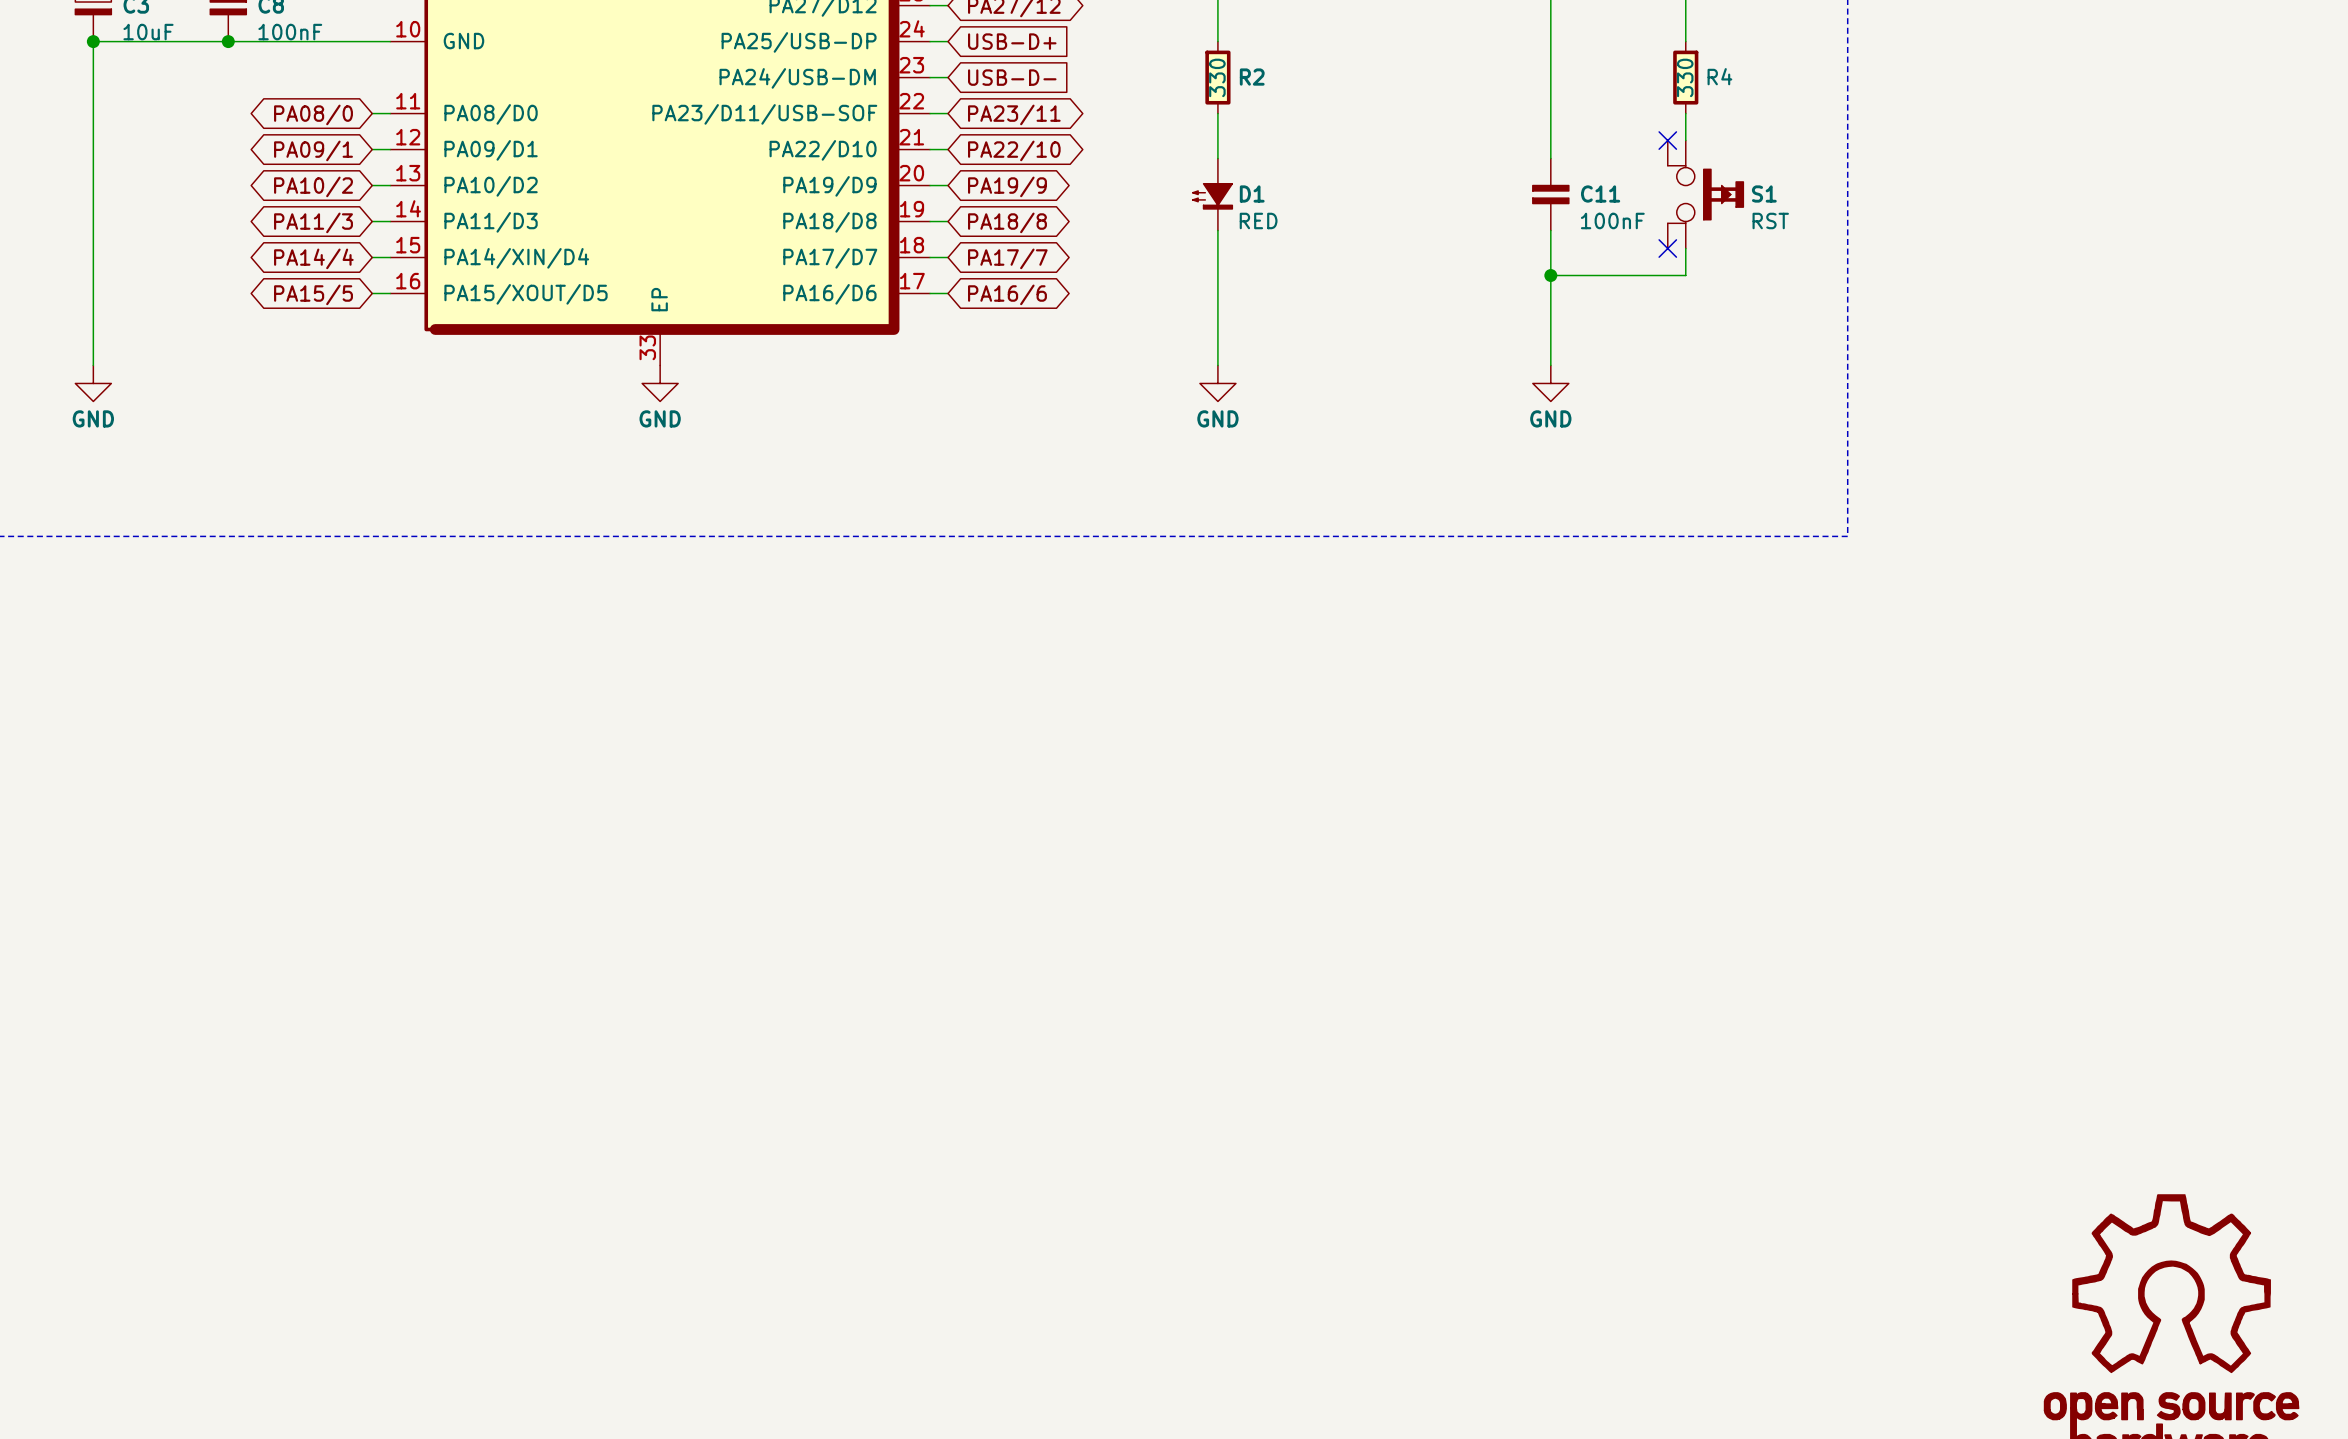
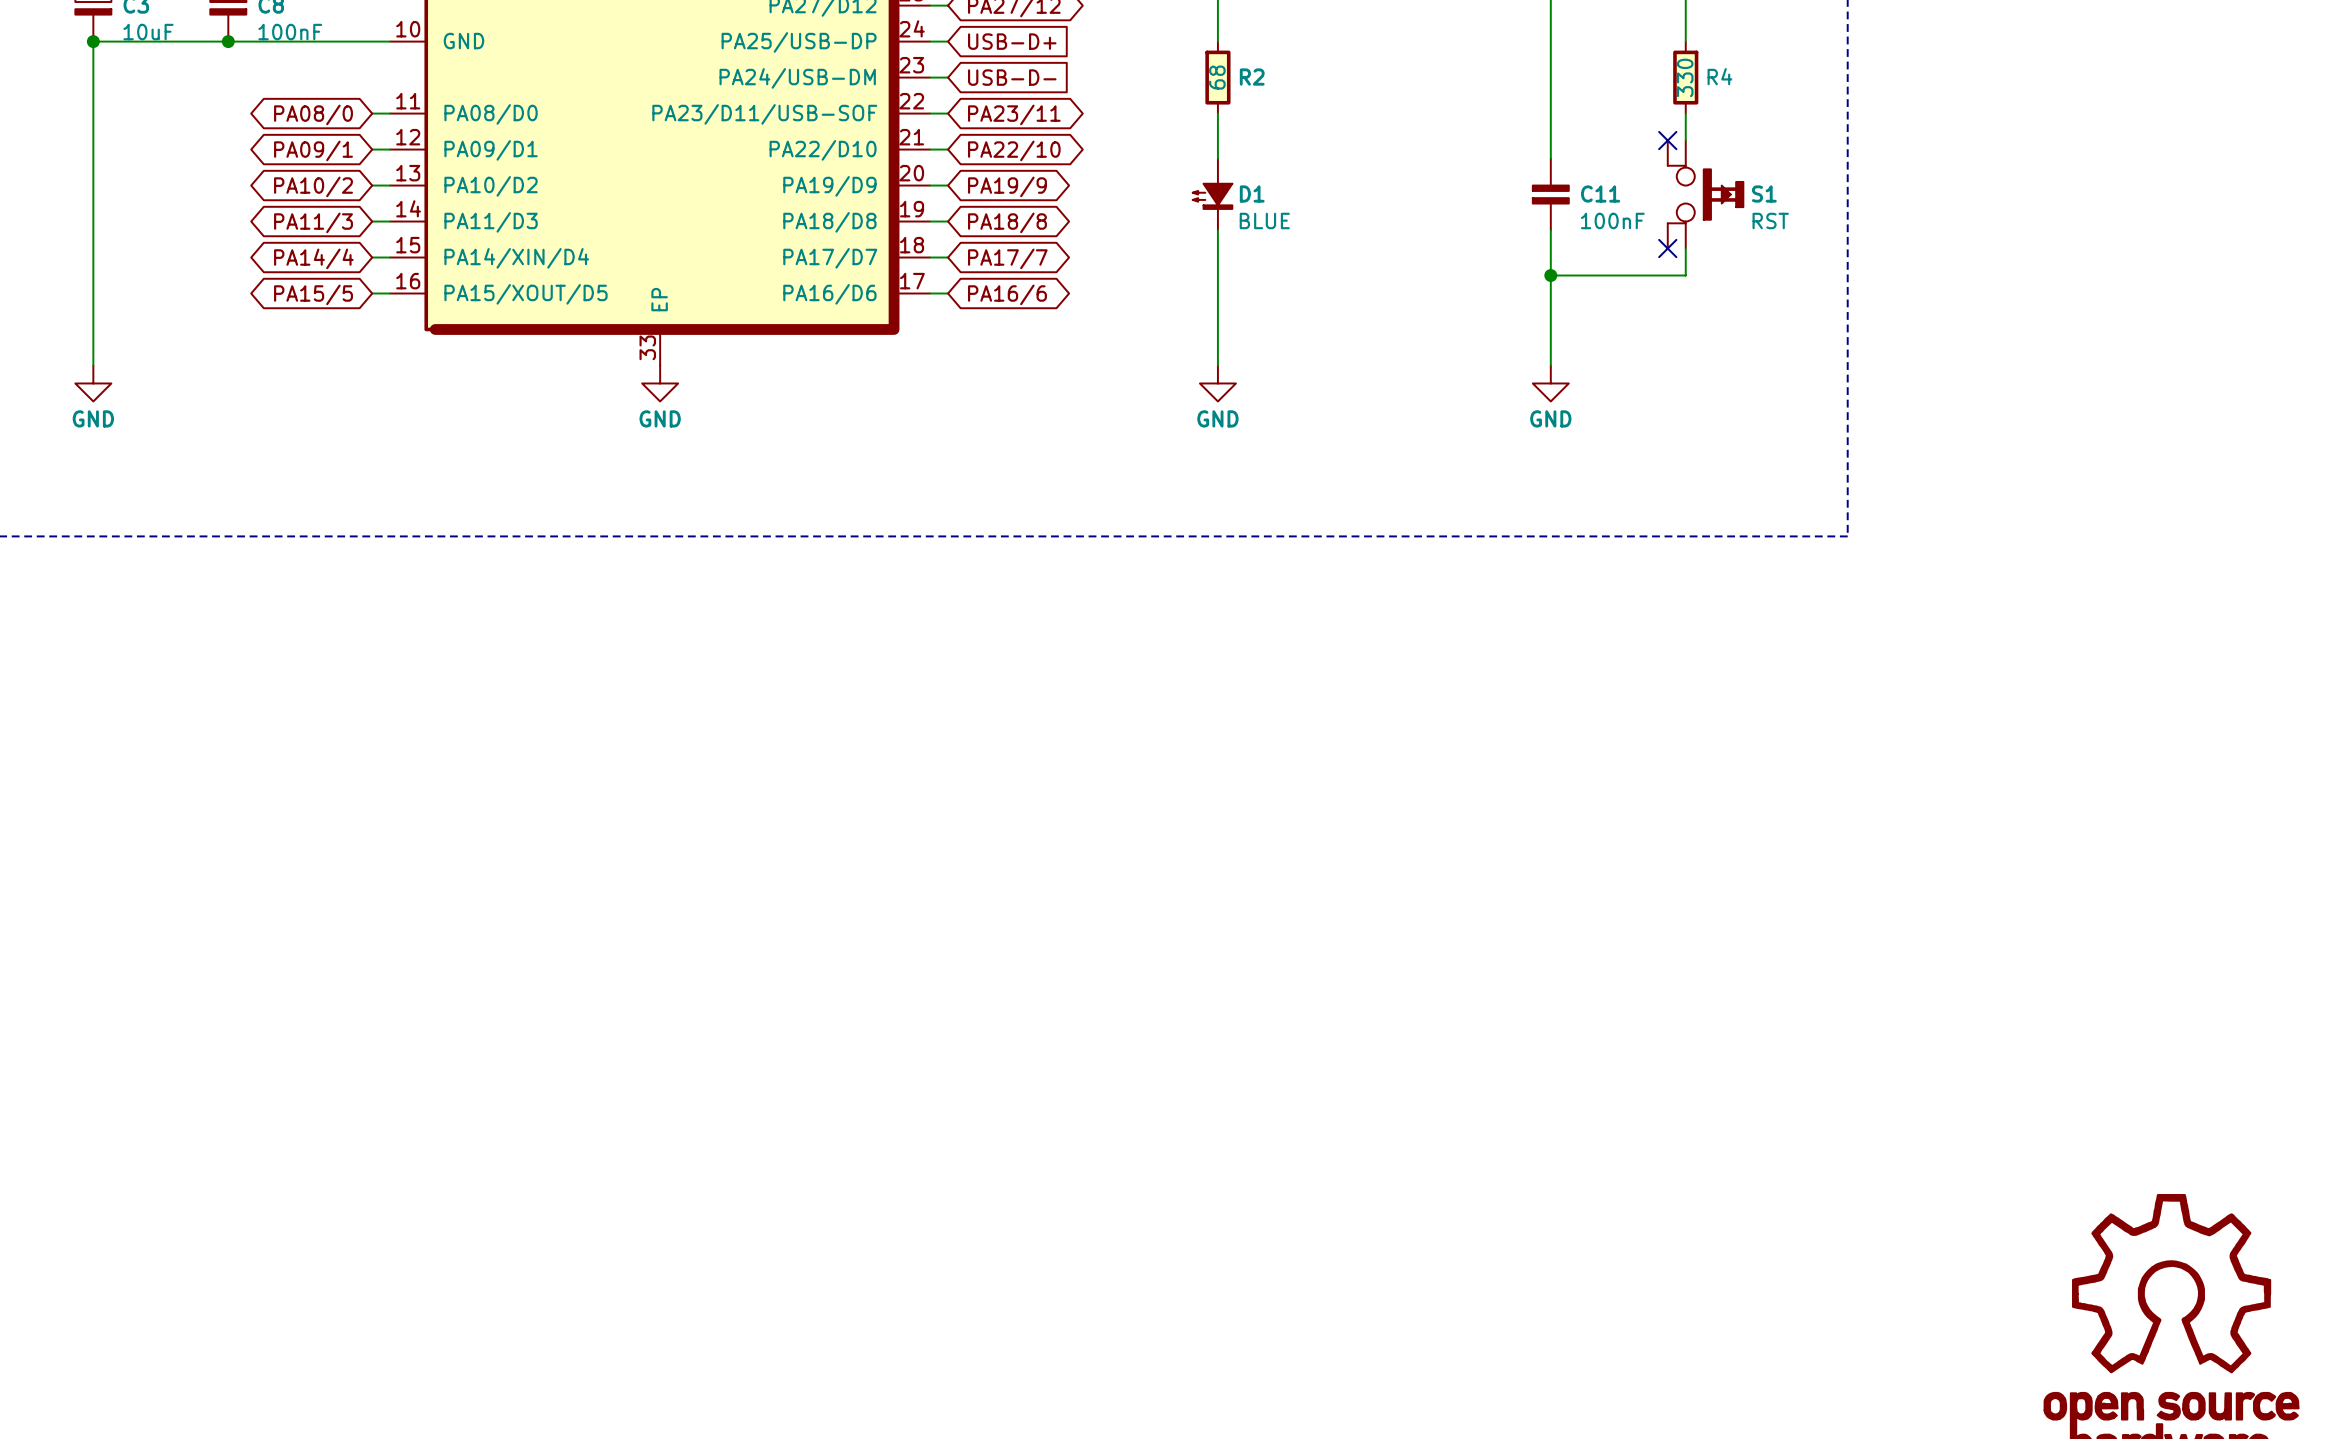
R2 value: 330 (1217, 77) -> 68 (1217, 77)
D1 value: RED (1258, 220) -> BLUE (1264, 220)

